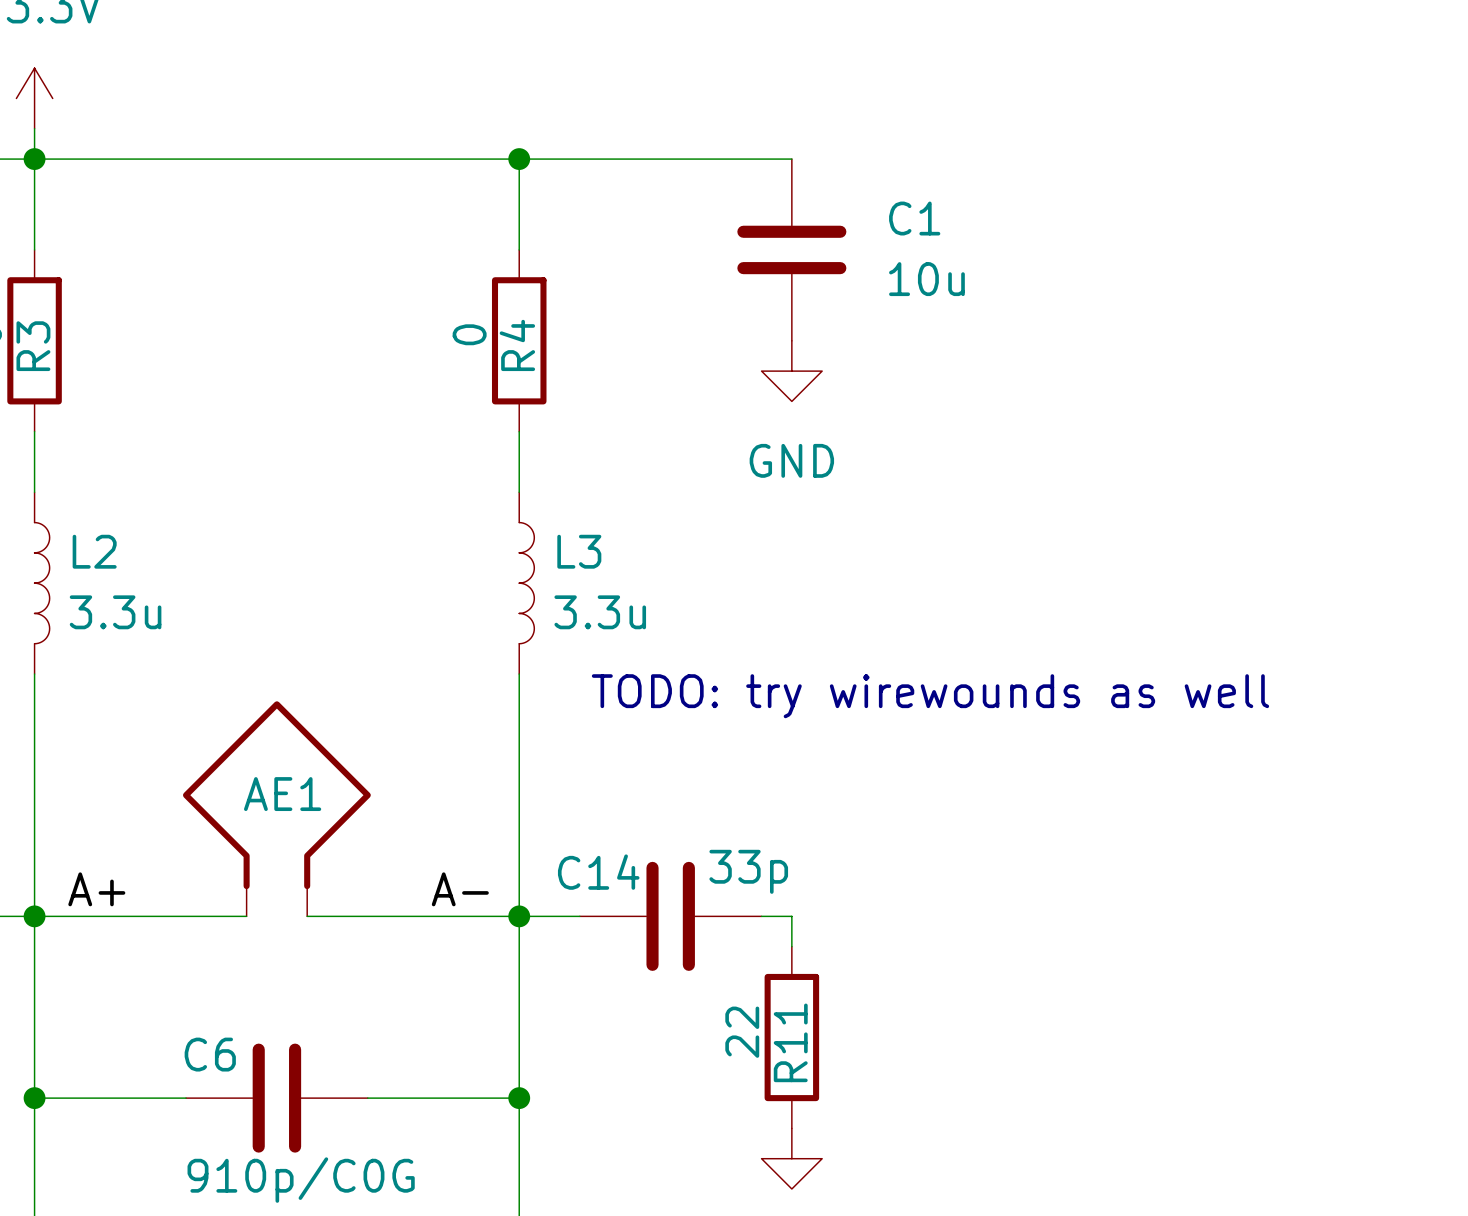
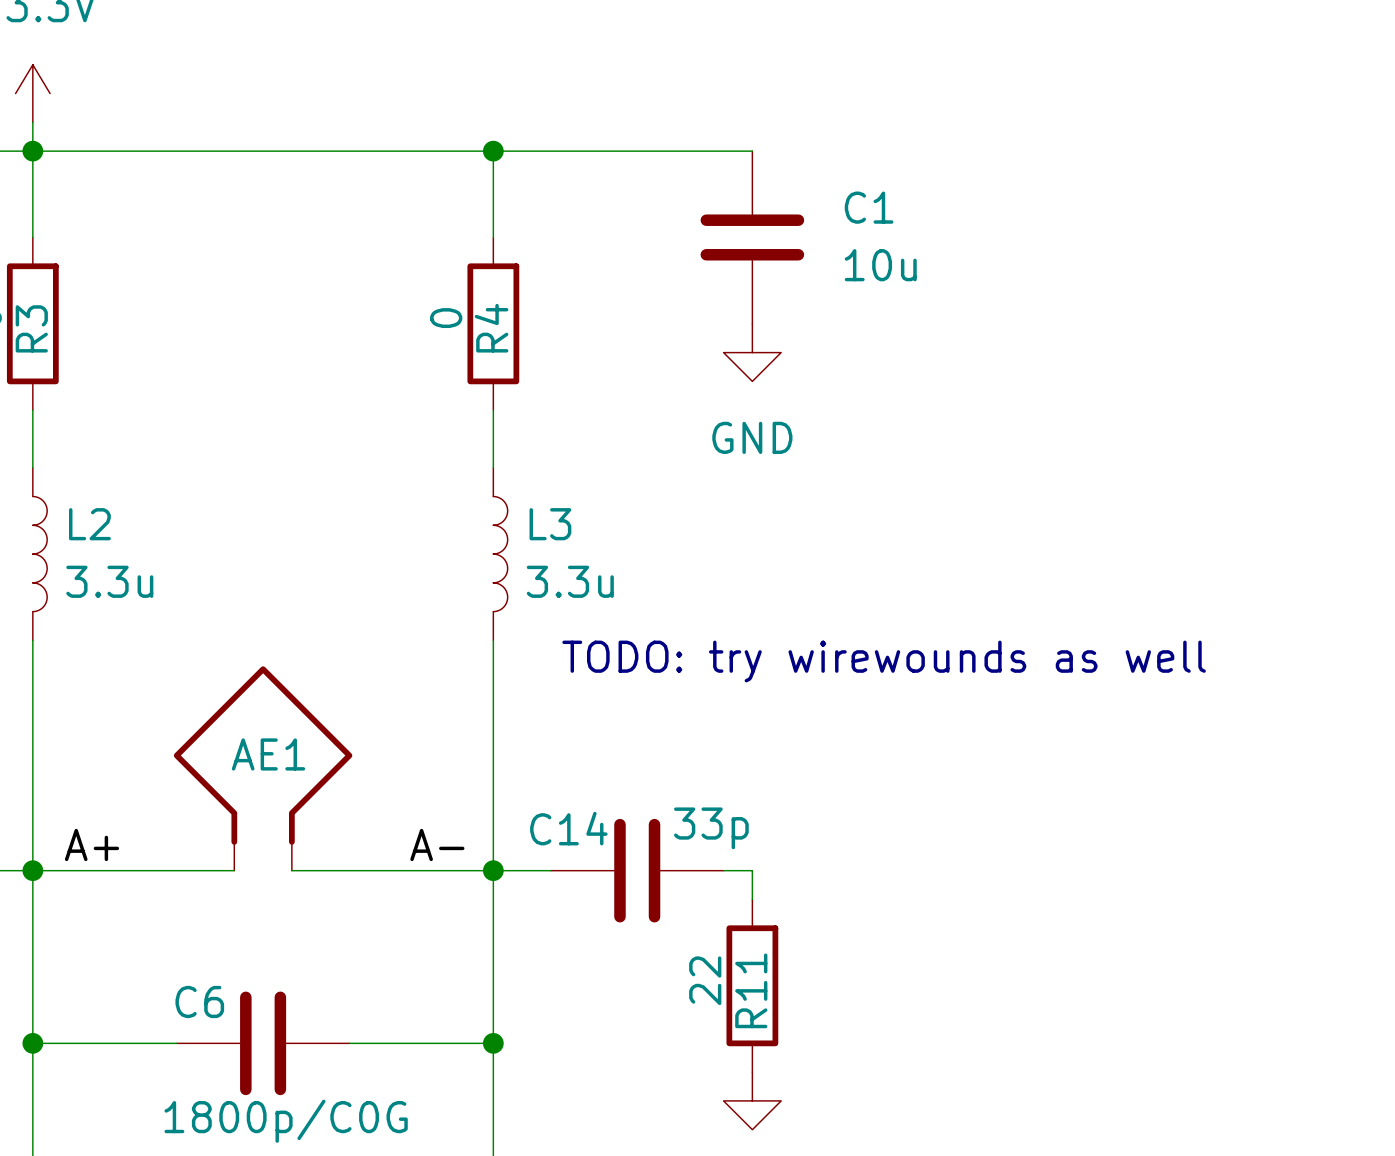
C6 value: 910p/C0G (301, 1180) -> 1800p/C0G (286, 1121)

